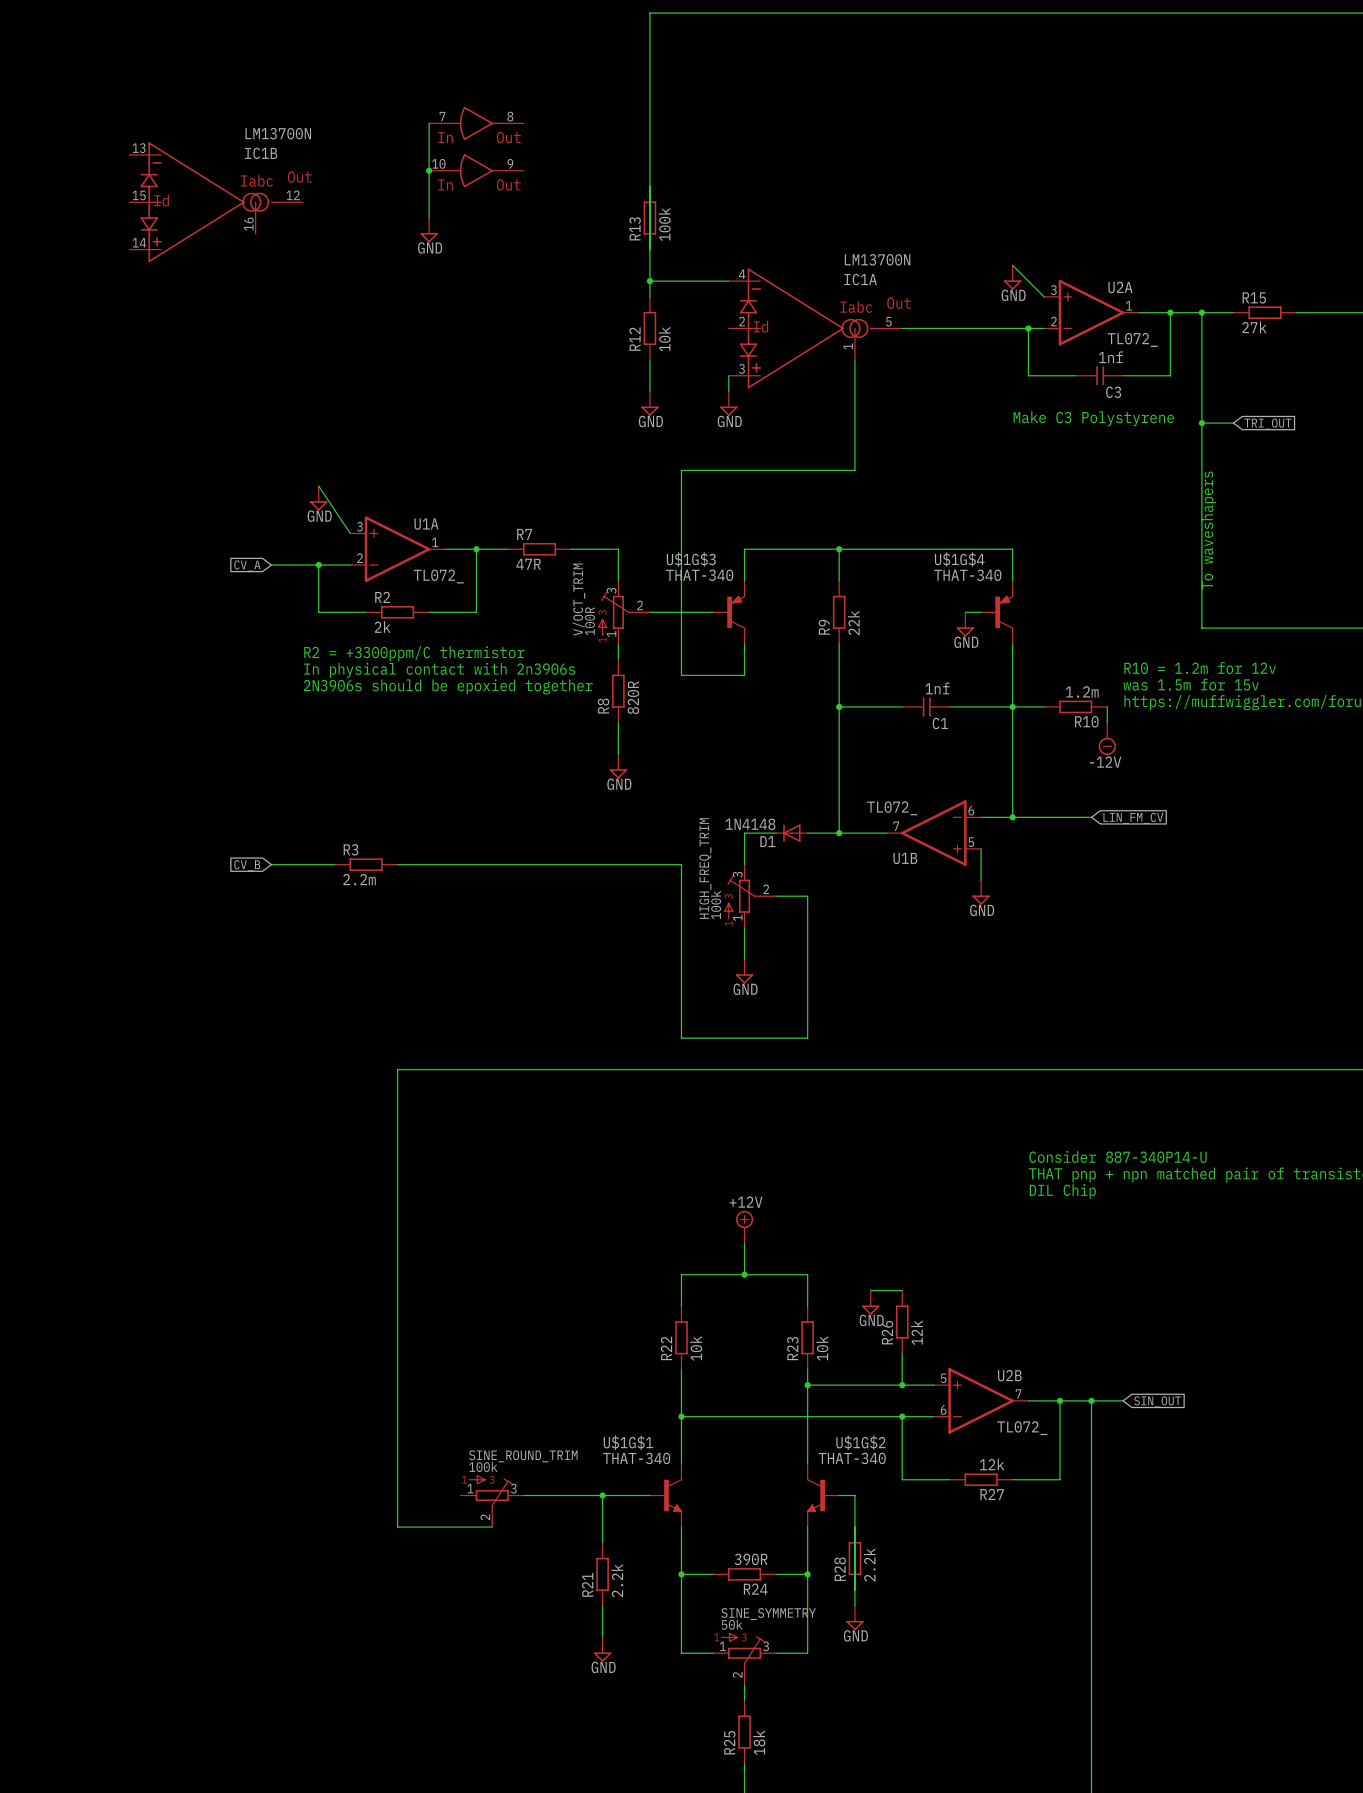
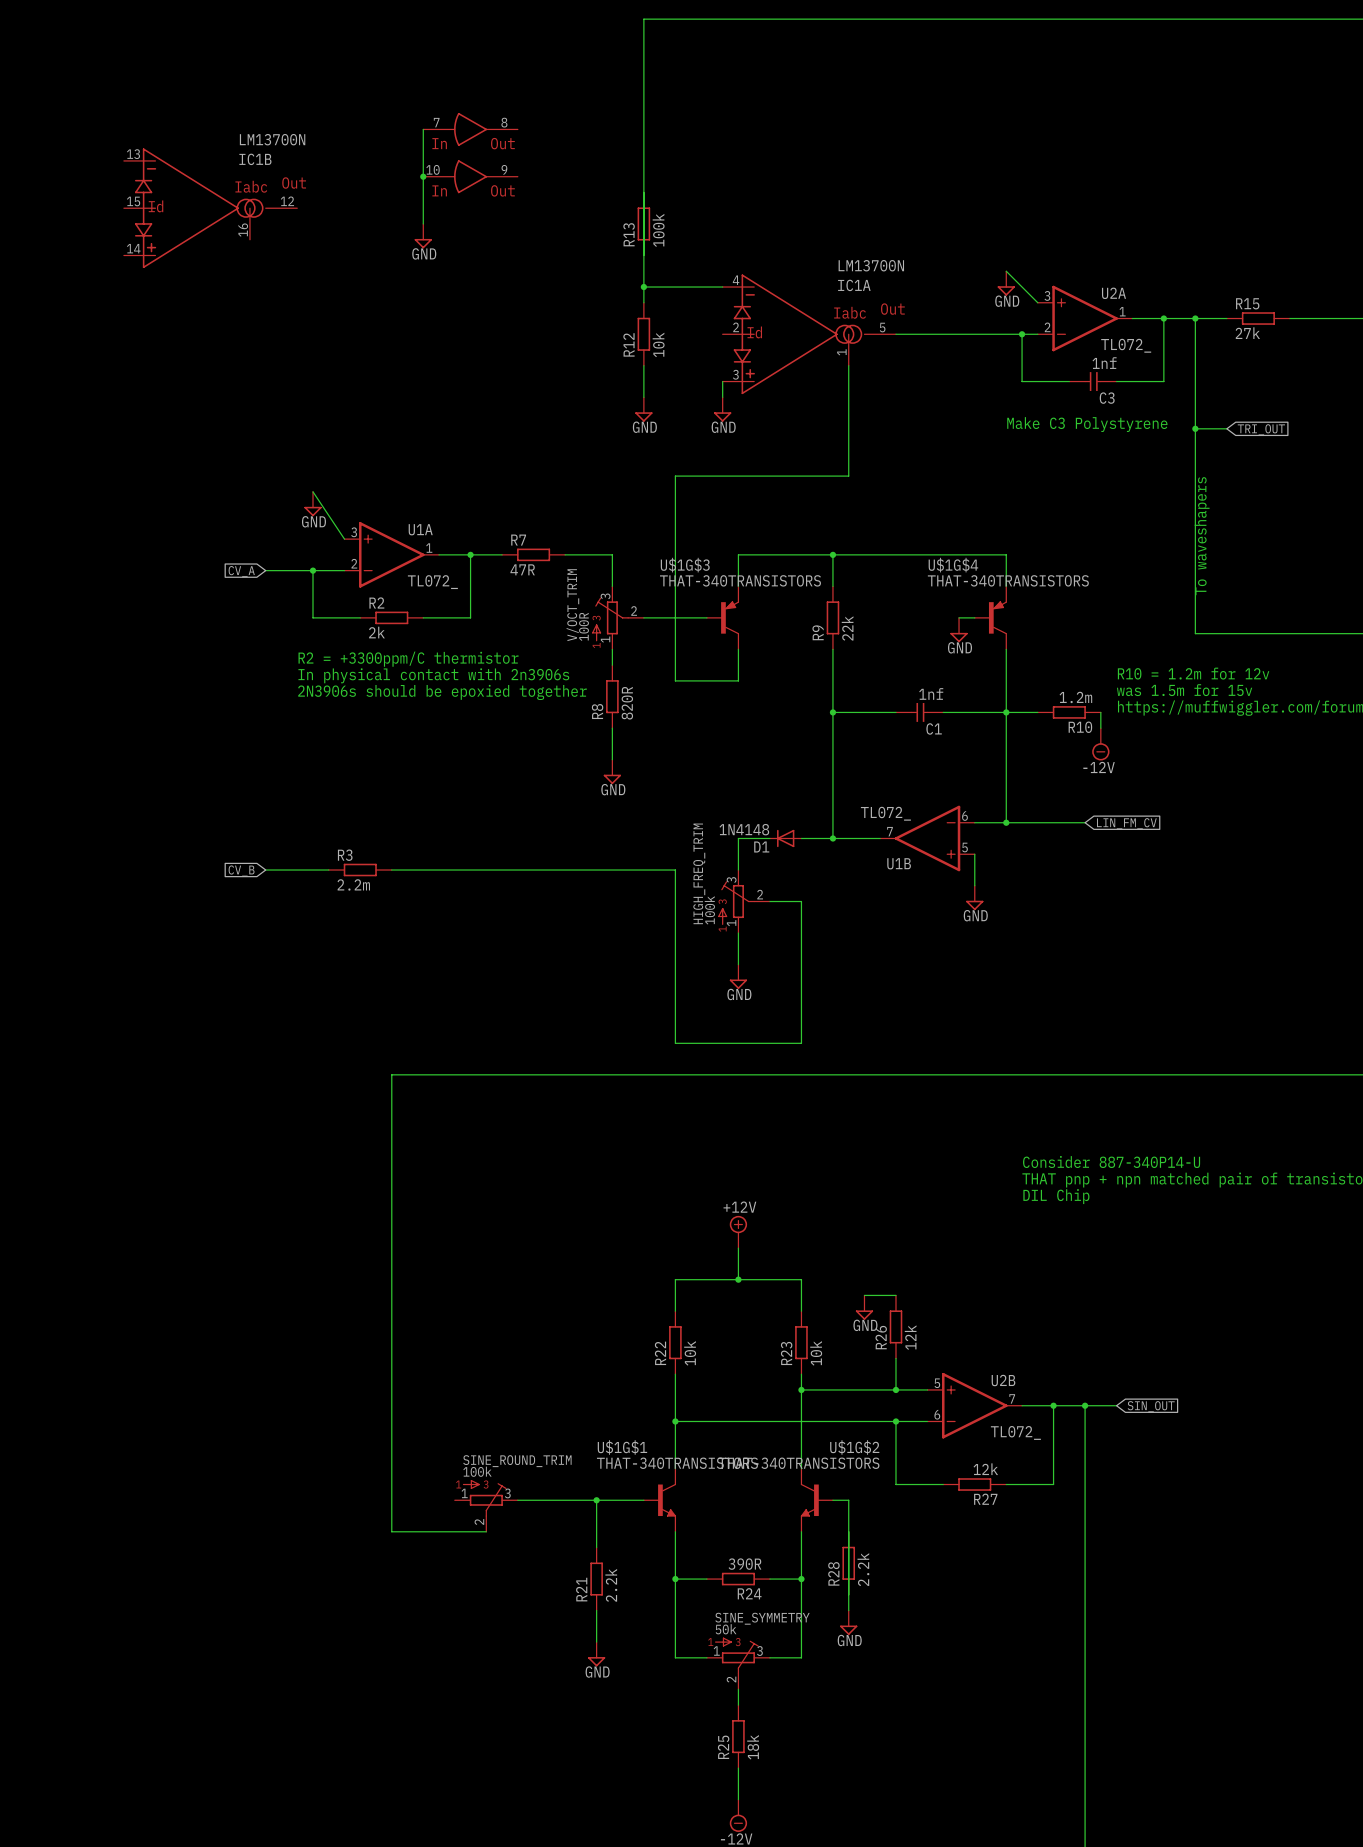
U$1G$3 value: THAT-340 (699, 575) -> THAT-340TRANSISTORS (740, 580)
U$1G$4 value: THAT-340 (967, 575) -> THAT-340TRANSISTORS (1008, 580)
U$1G$1 value: THAT-340 (636, 1458) -> THAT-340TRANSISTORS (677, 1463)
U$1G$2 value: THAT-340 (852, 1458) -> THAT-340TRANSISTORS (798, 1463)

